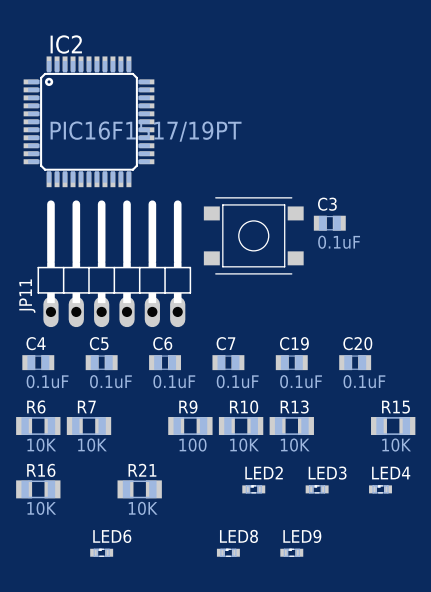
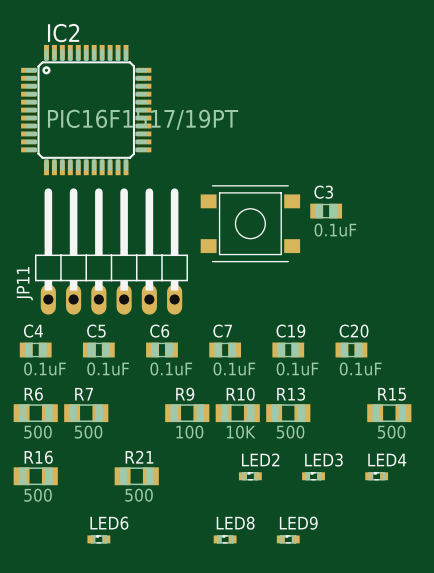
R6 value: 10K (41, 445) -> 500 (38, 432)
R7 value: 10K (92, 445) -> 500 (88, 432)
R13 value: 10K (295, 445) -> 500 (290, 432)
R15 value: 10K (396, 445) -> 500 (391, 432)
R16 value: 10K (41, 508) -> 500 (38, 495)
R21 value: 10K (143, 508) -> 500 (139, 495)

